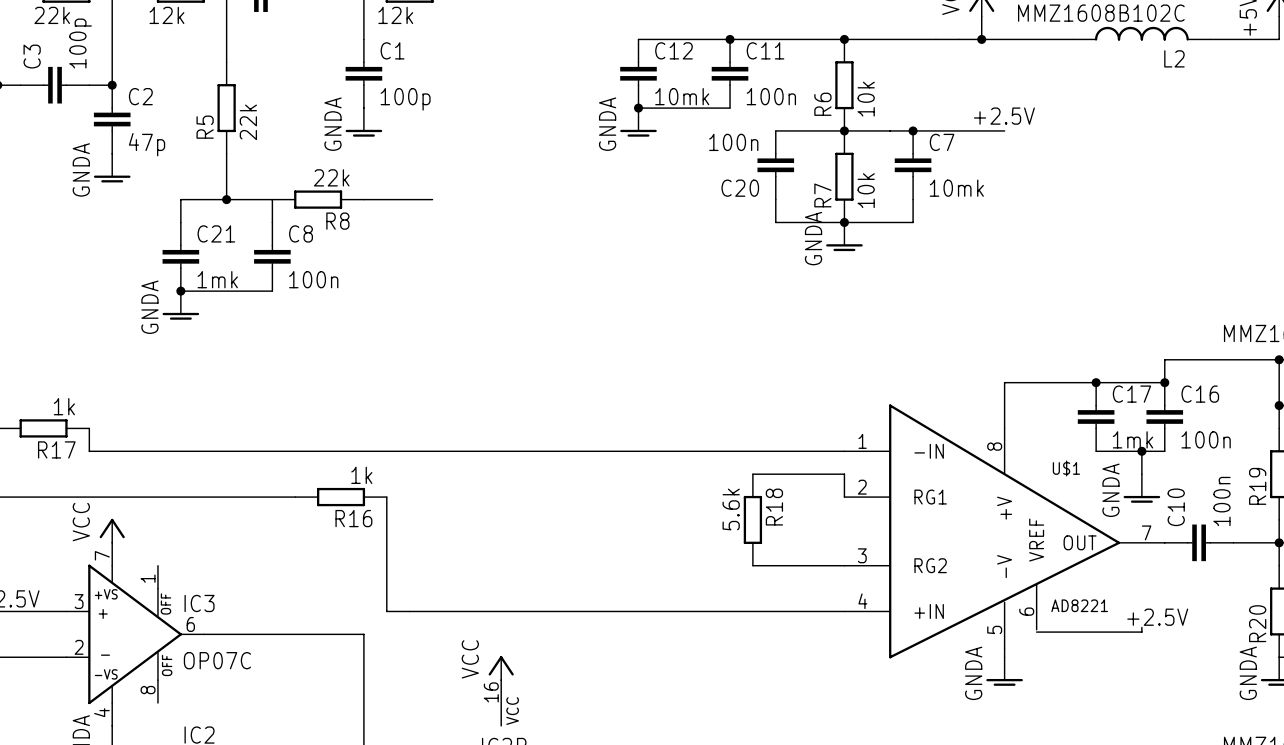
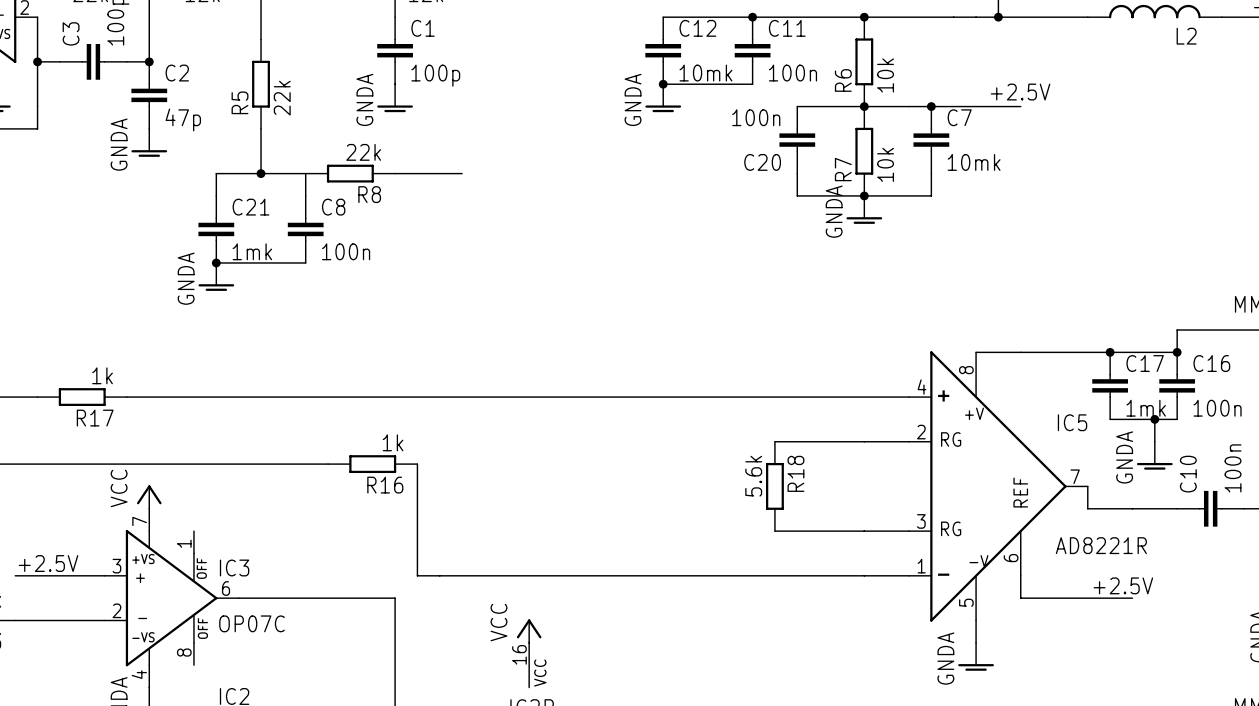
wire: (1004, 382) (1004, 428) -> (1020, 352) (976, 352)
wire: (89, 428) (89, 451) (844, 451) -> (126, 397) (909, 397)
wire: (844, 474) (844, 497) -> (864, 441) (909, 441)
IC5: none -> AD8221R (998, 486)
wire: none -> (1087, 486) (1087, 508) (1177, 508)
U$1: AD8221 (1004, 531) -> none
wire: none -> (1020, 575) (1020, 598) (1132, 598)
label position: +2.5V (1157, 617) -> +2.5V (1123, 585)
wire: (1141, 627) (1141, 632) (1036, 632) -> none
wire: (1004, 648) (1004, 657) -> none
wire: none -> (976, 620) (976, 642)
power symbol position: GNDA (1004, 671) -> GNDA (976, 656)

